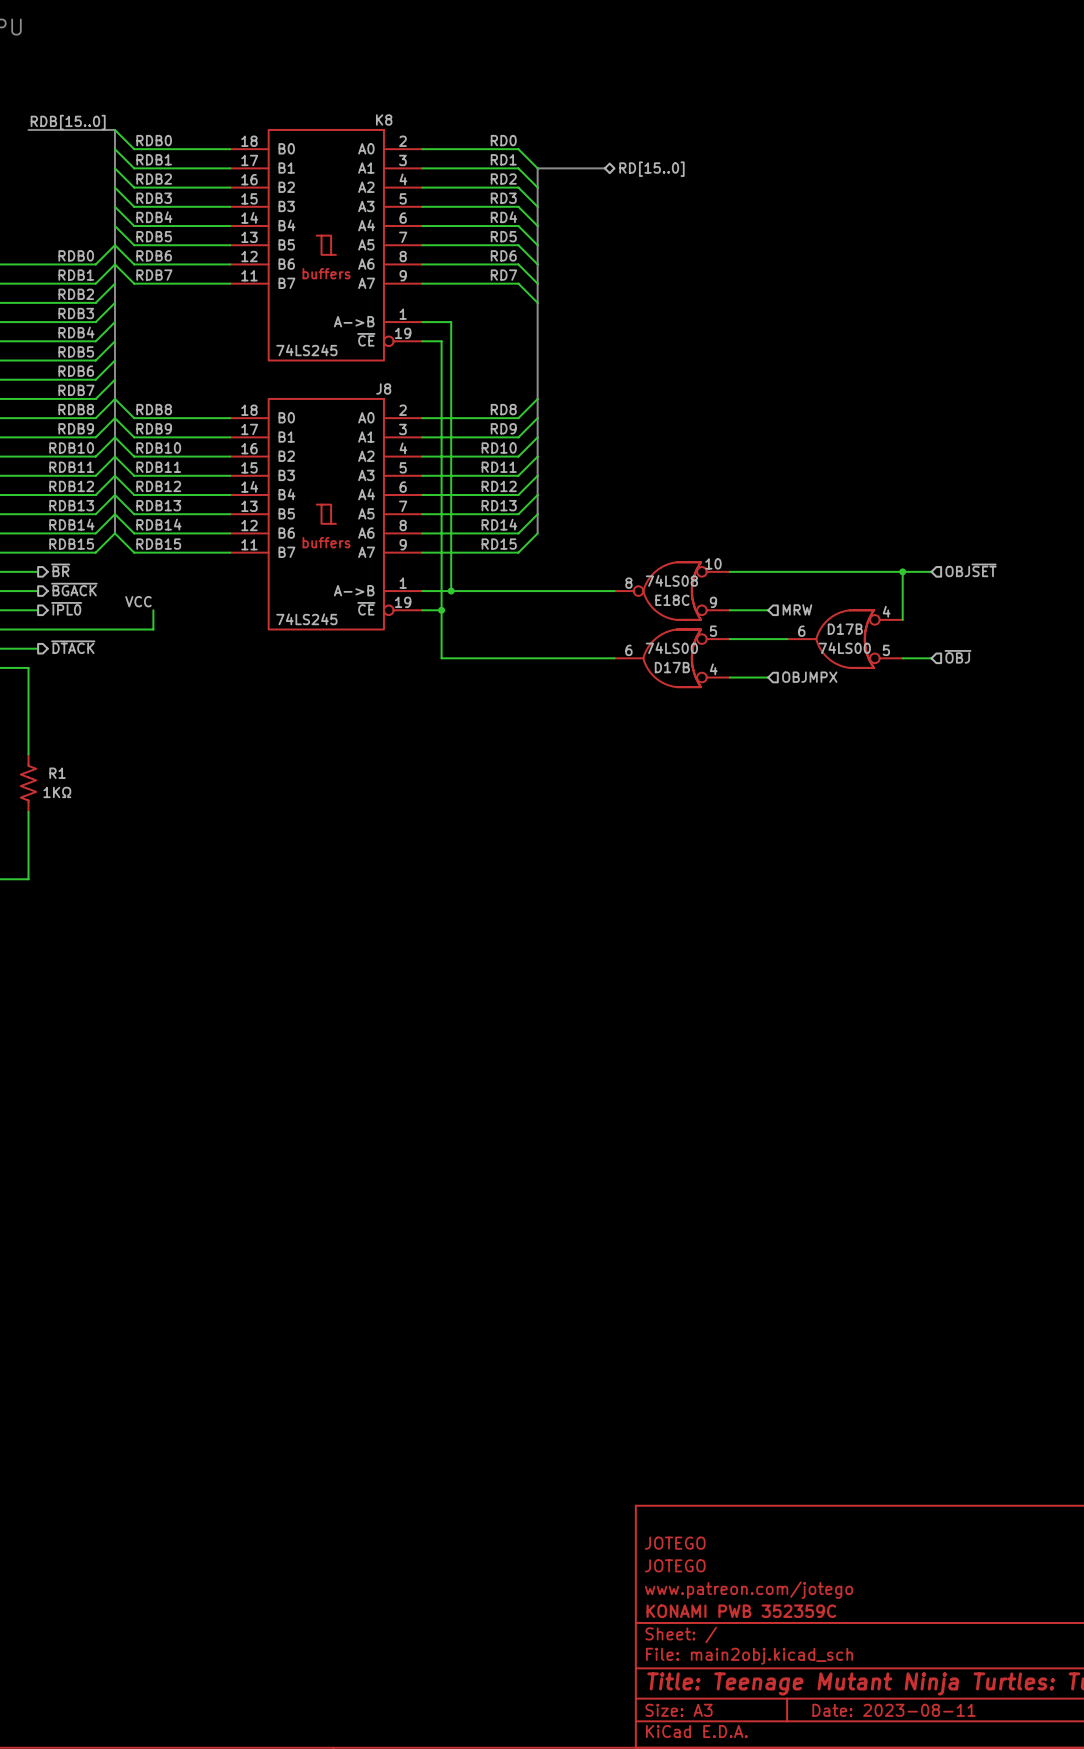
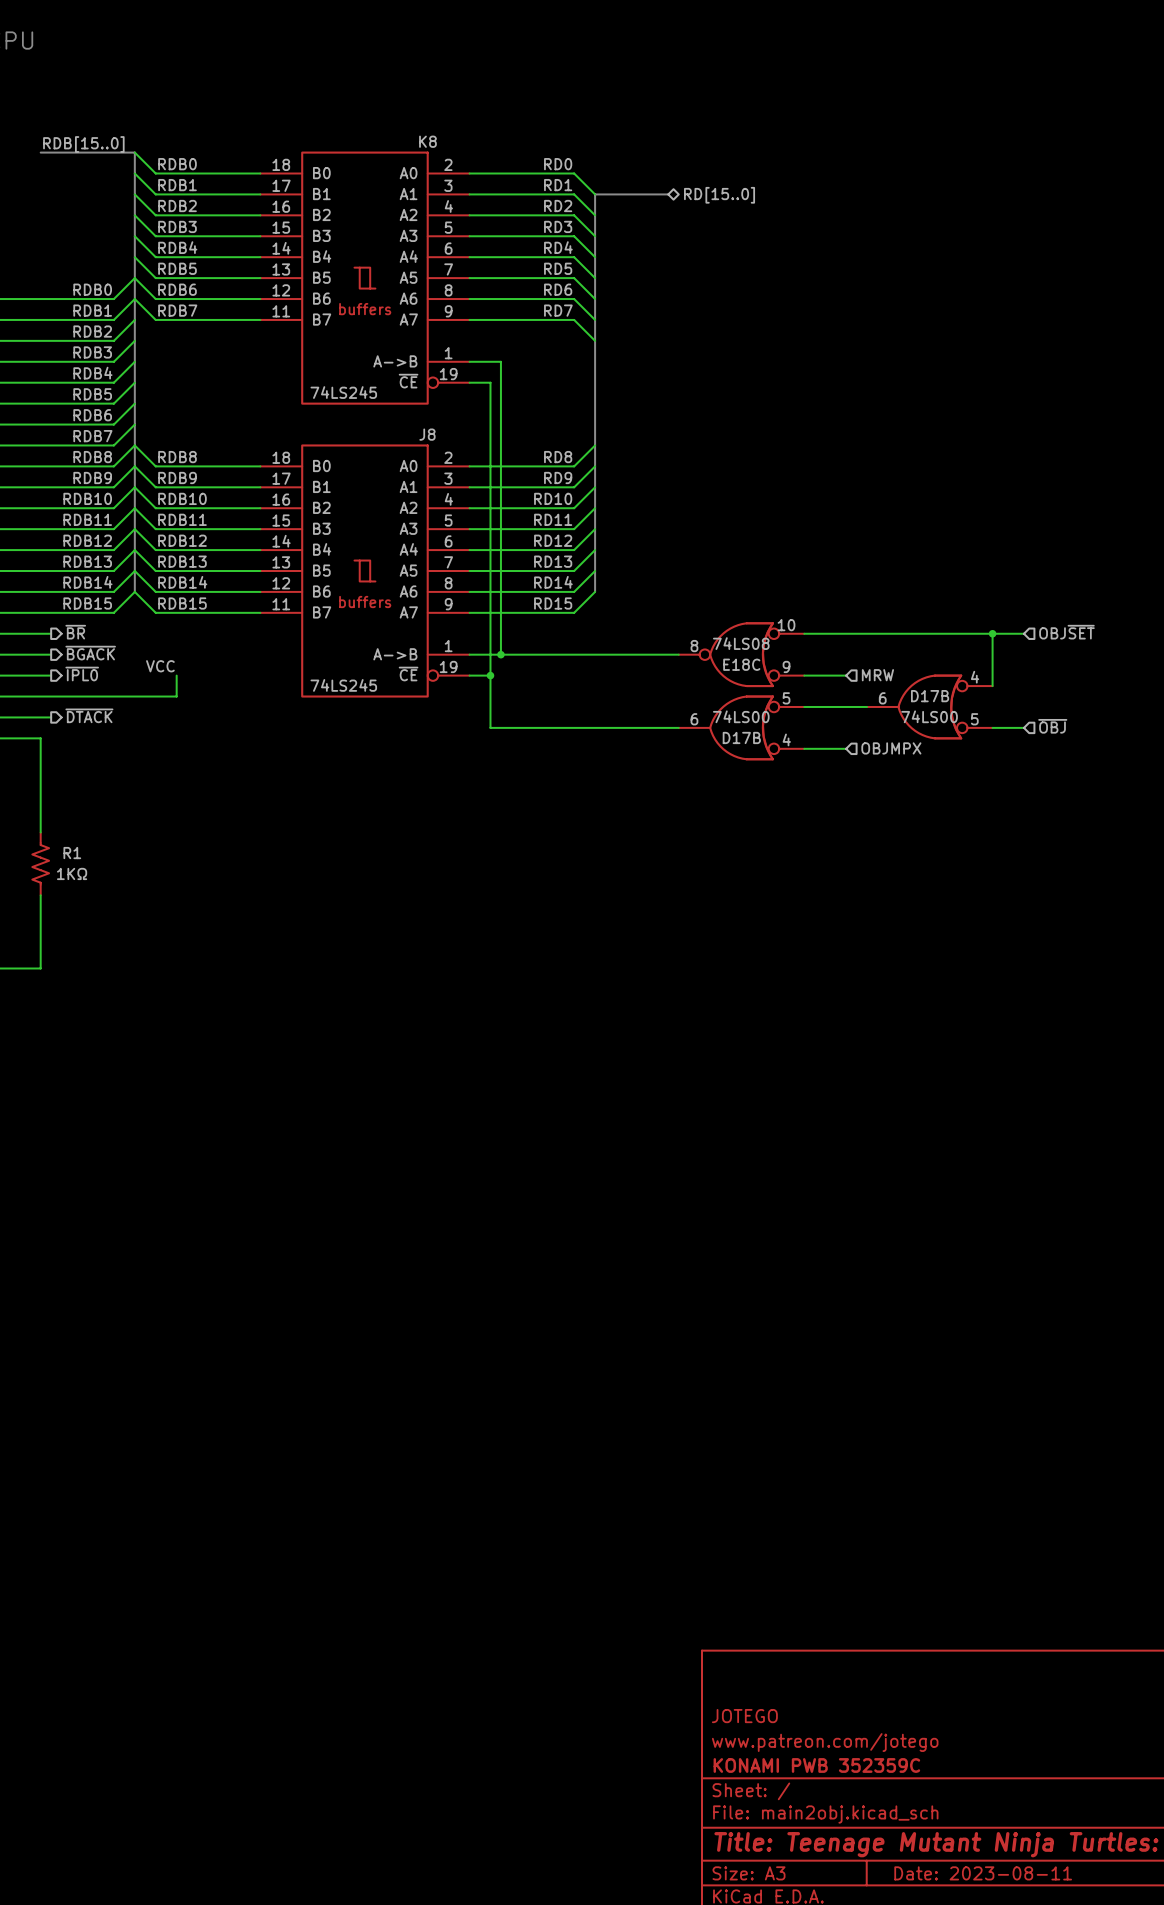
title block: JOTEGO (675, 1543) -> none

